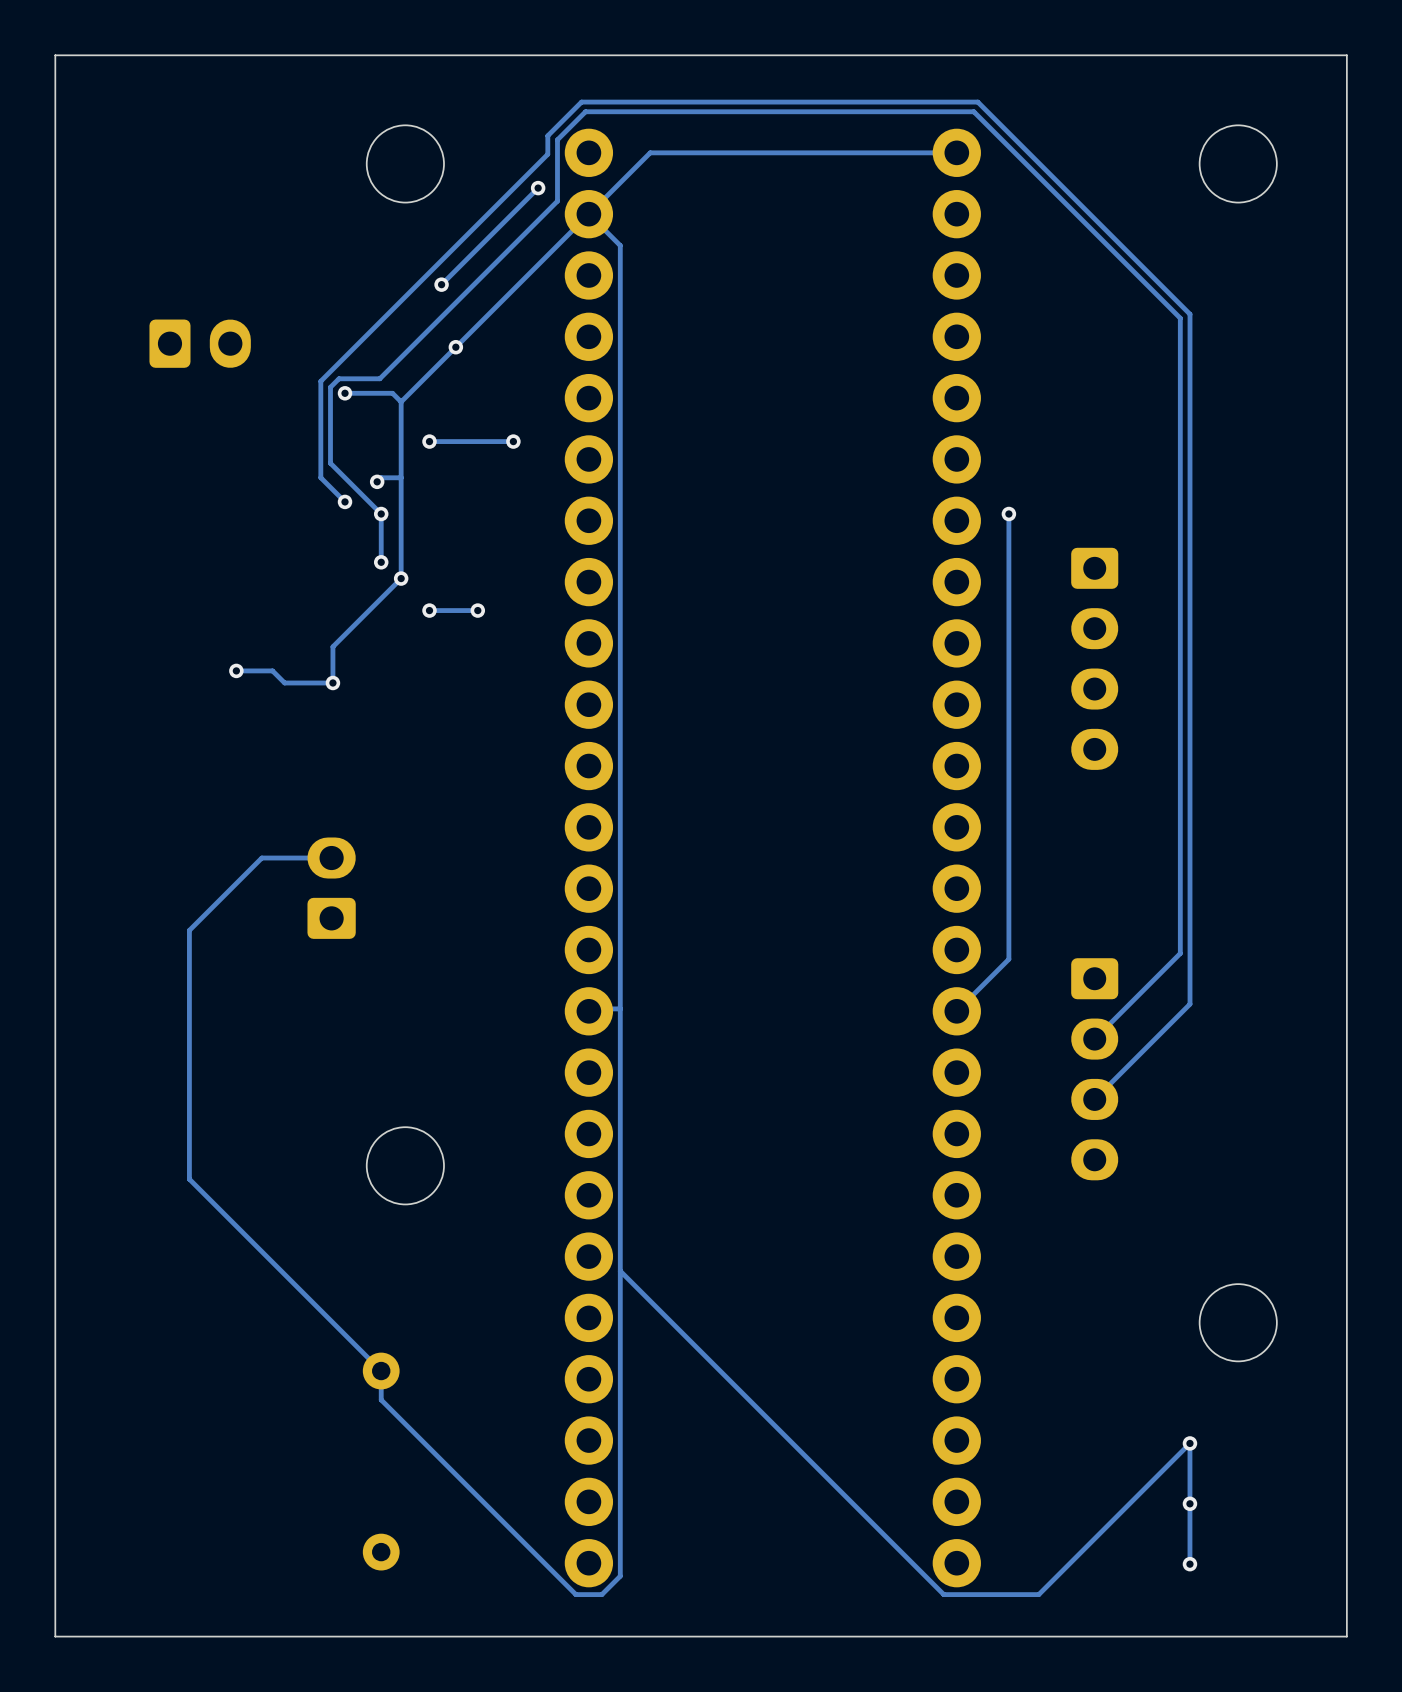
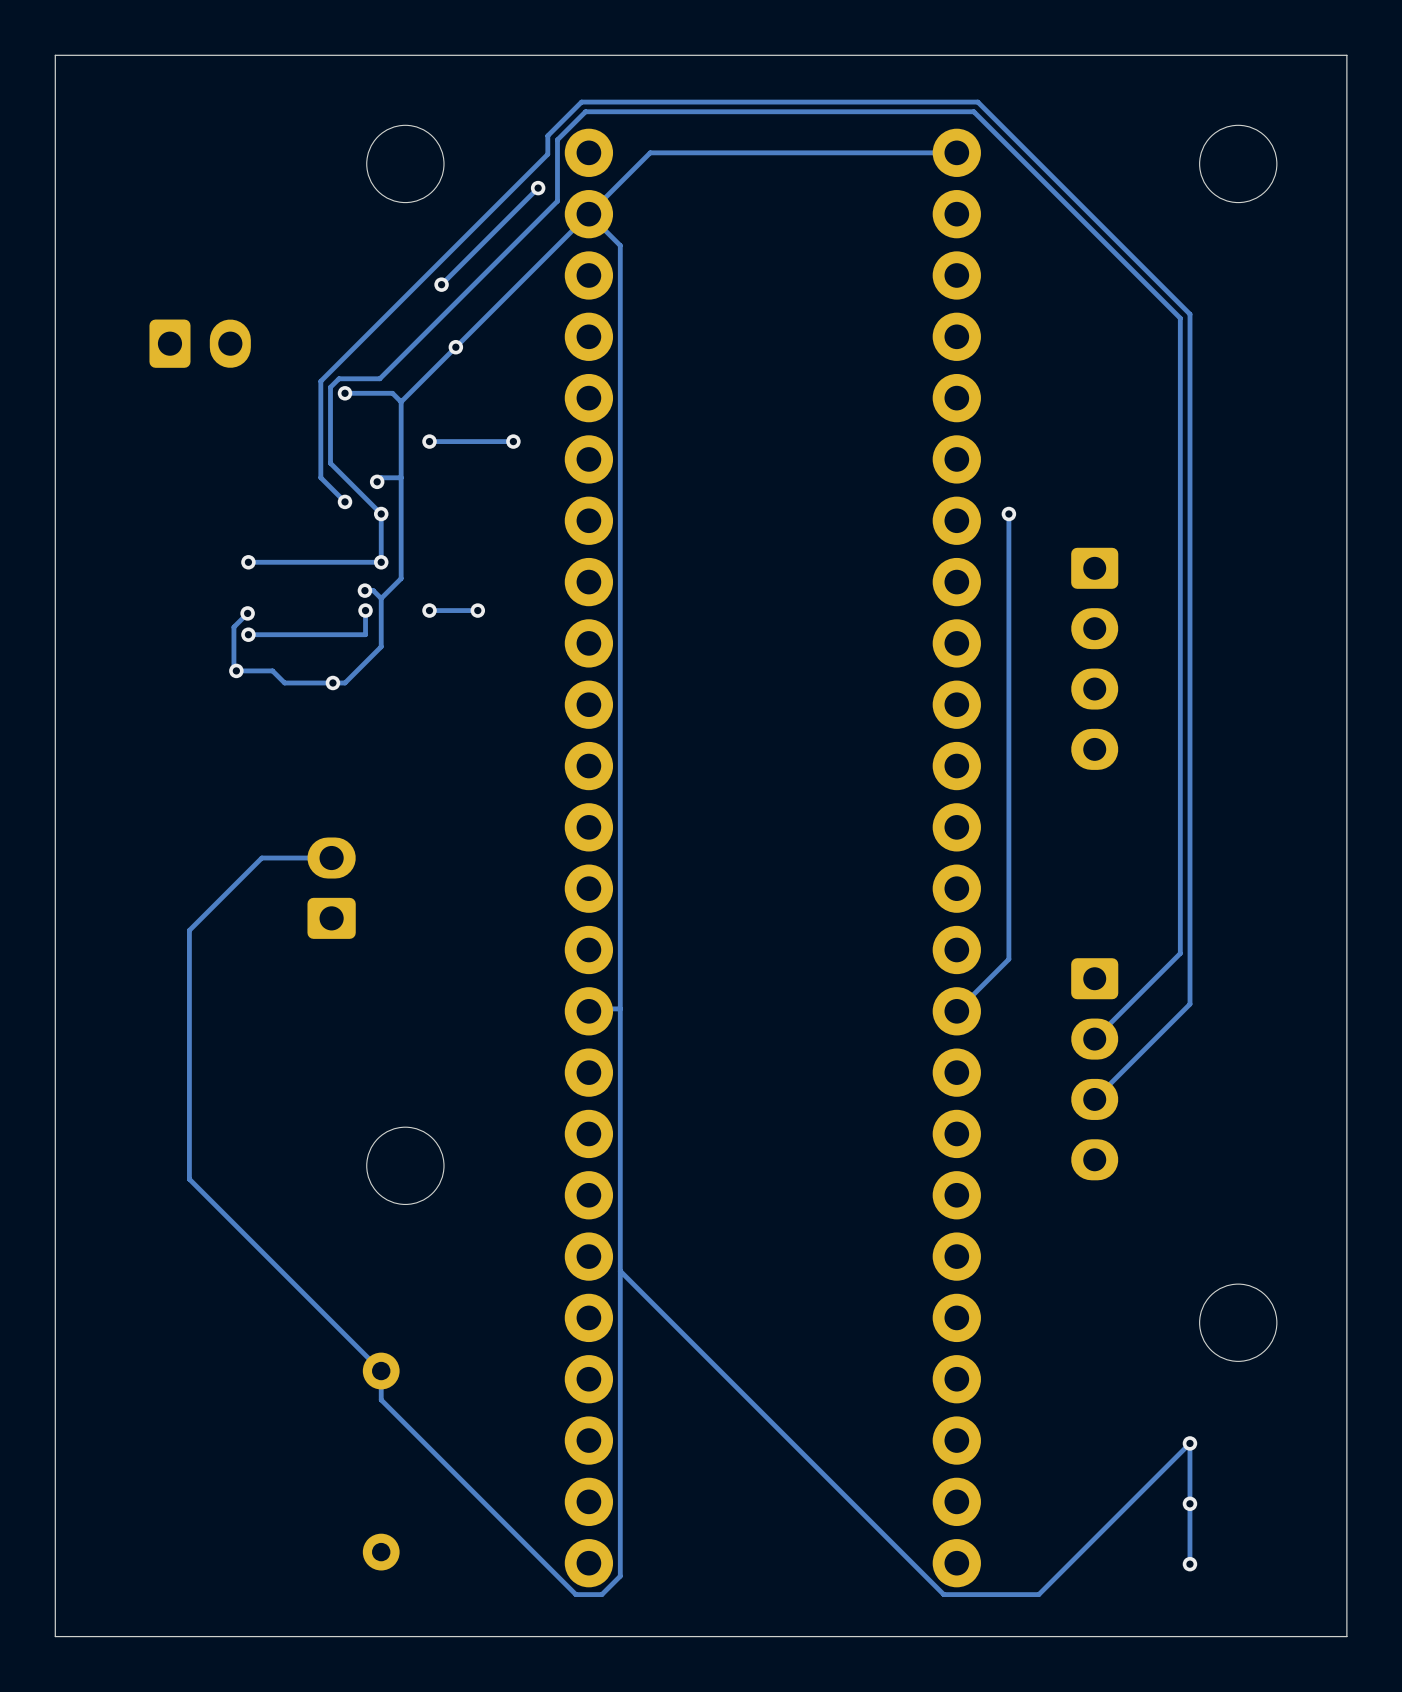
via: none -> (248, 562)
track: none -> (381, 562) (248, 562)
via: (401, 578) -> none
via: none -> (364, 590)
track: (381, 598) (332, 646) (332, 682) -> (364, 590) (373, 590) (381, 598) (381, 646) (345, 682) (332, 682)
track: none -> (365, 610) (365, 634) (248, 634)
via: none -> (365, 610)
track: none -> (247, 613) (233, 627) (233, 668) (236, 670)
via: none -> (247, 613)
via: none -> (248, 634)

